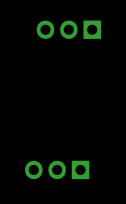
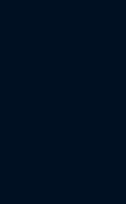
part: (68, 29) -> none
part: (57, 169) -> none

